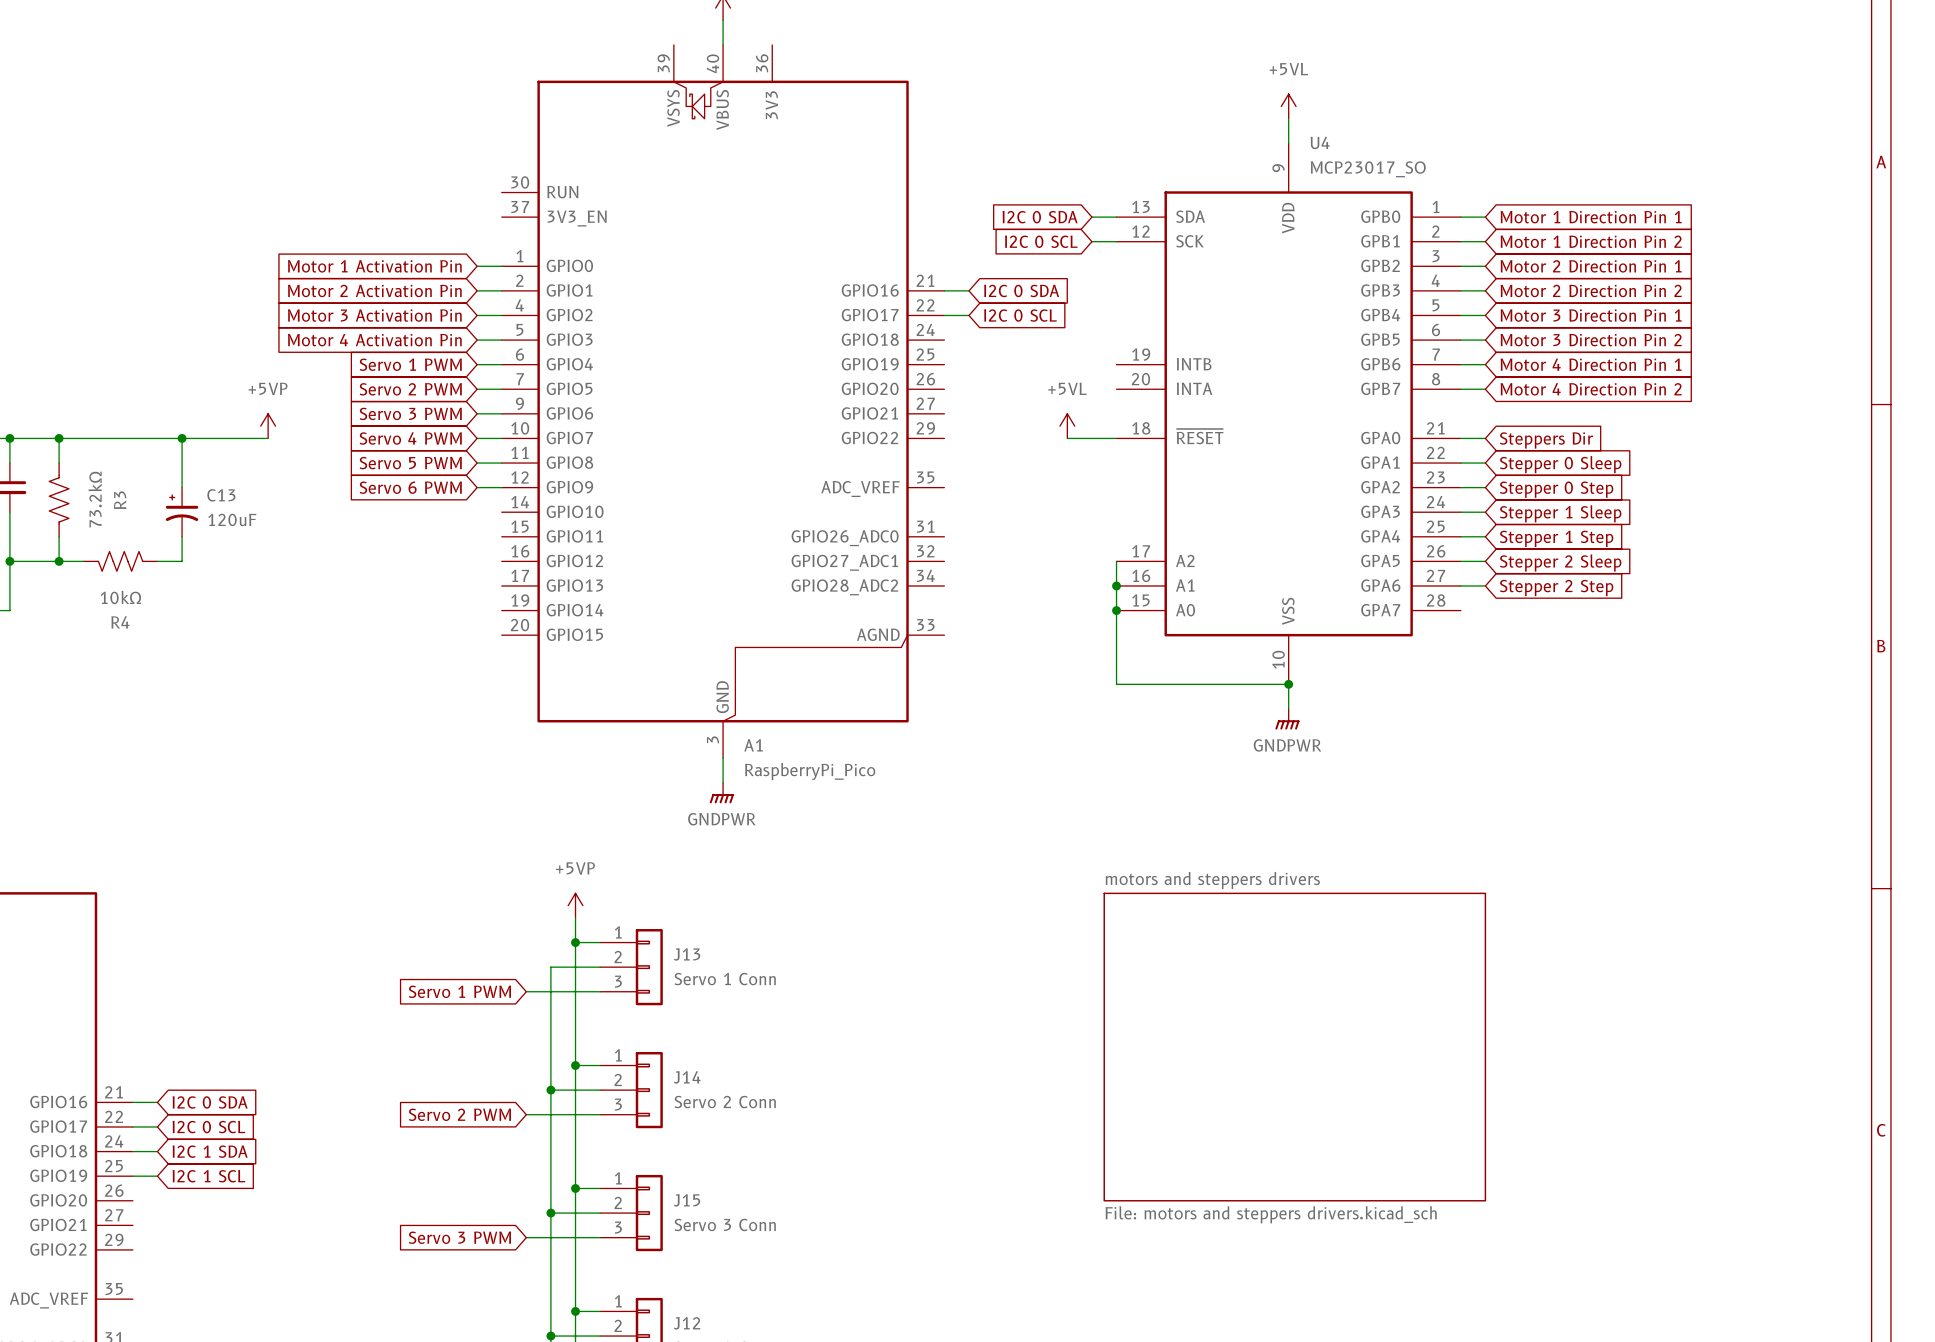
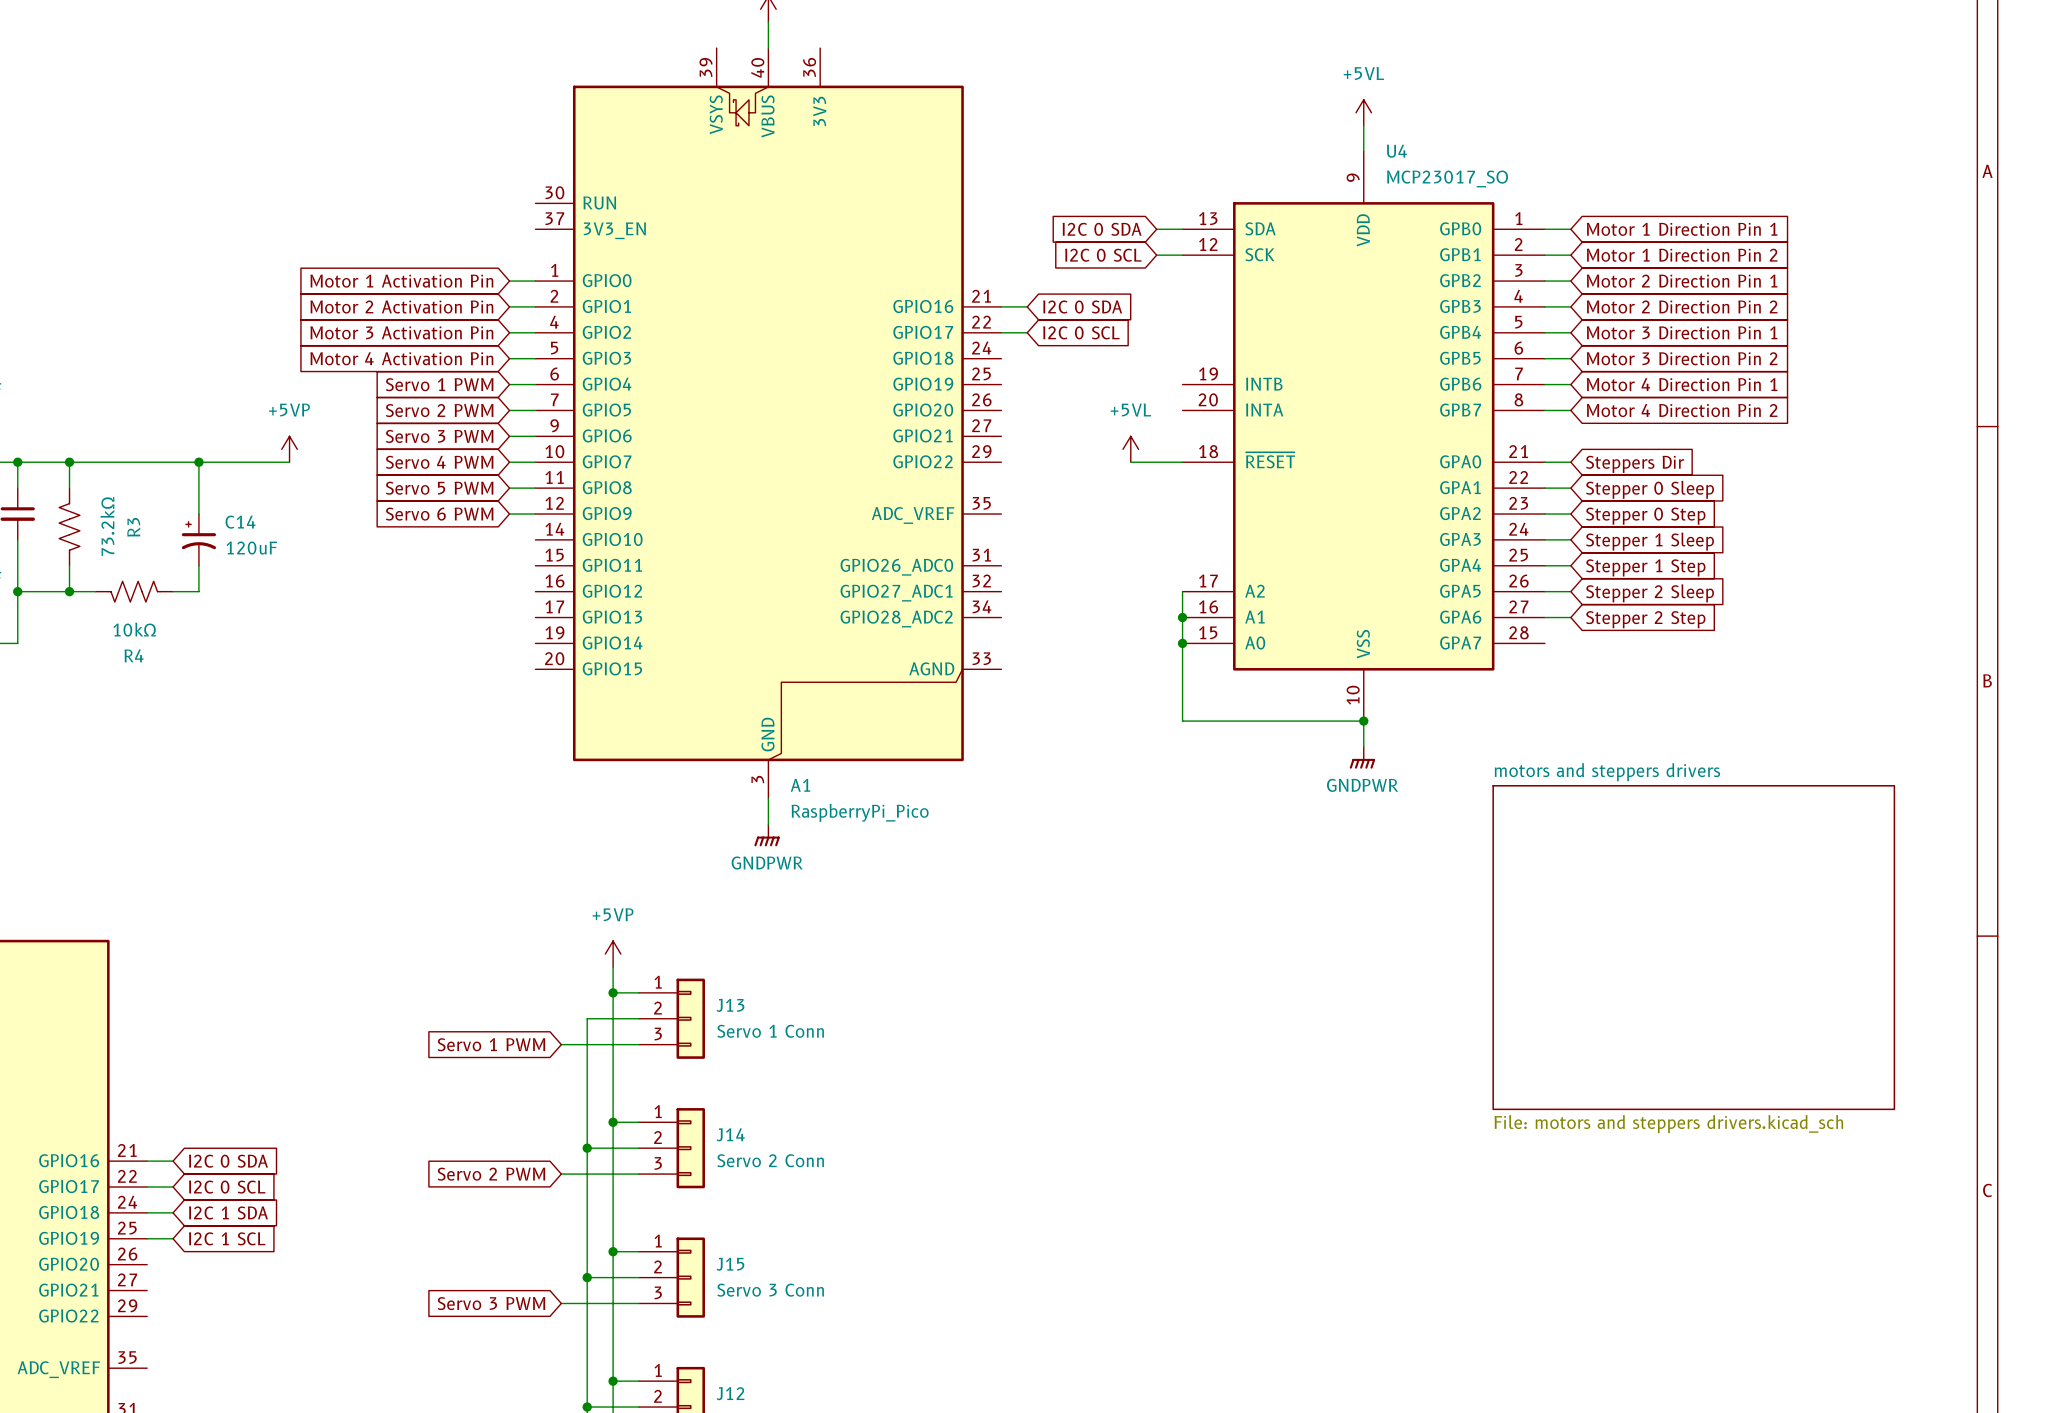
C13 name: C13 (221, 495) -> C14 (240, 522)
sheet motors and steppers drivers: none -> File: motors and steppers drivers.kicad_sch (1693, 947)
sheet motors and steppers drivers: File: motors and steppers drivers.kicad_sch (1294, 1047) -> none

